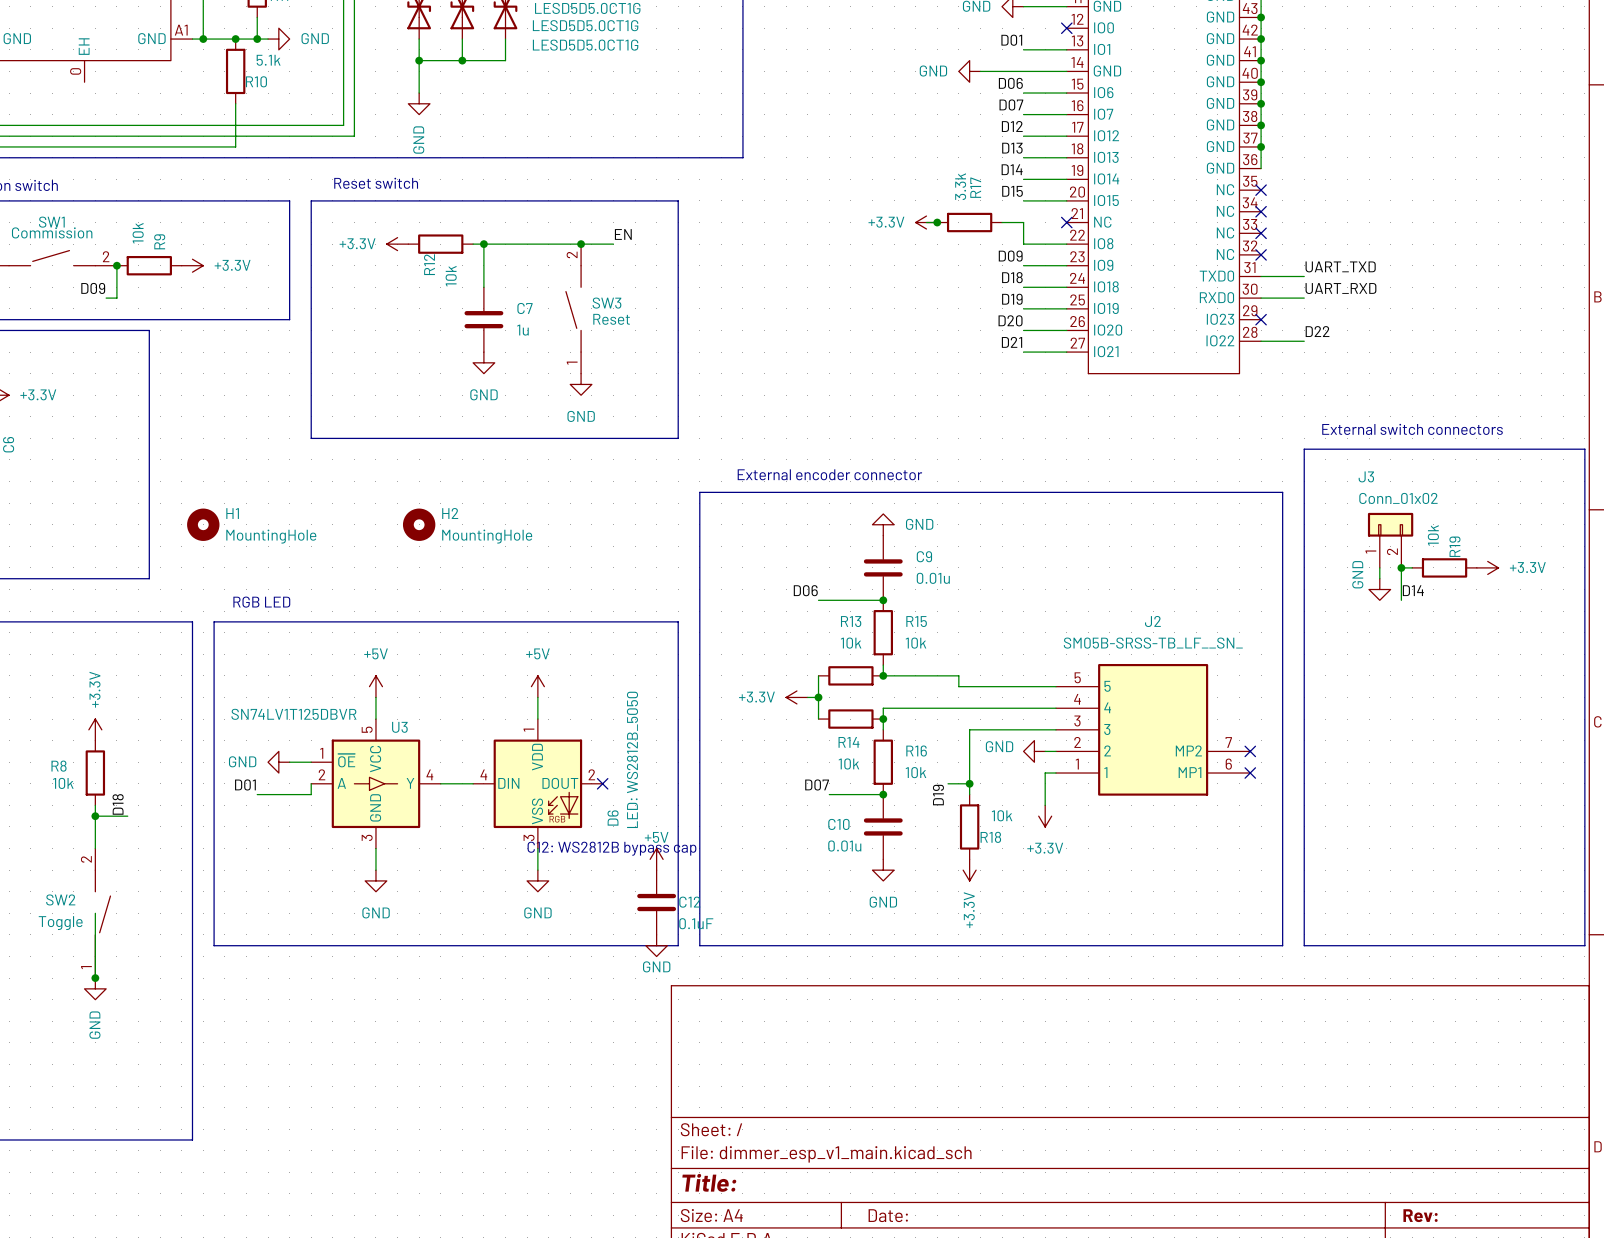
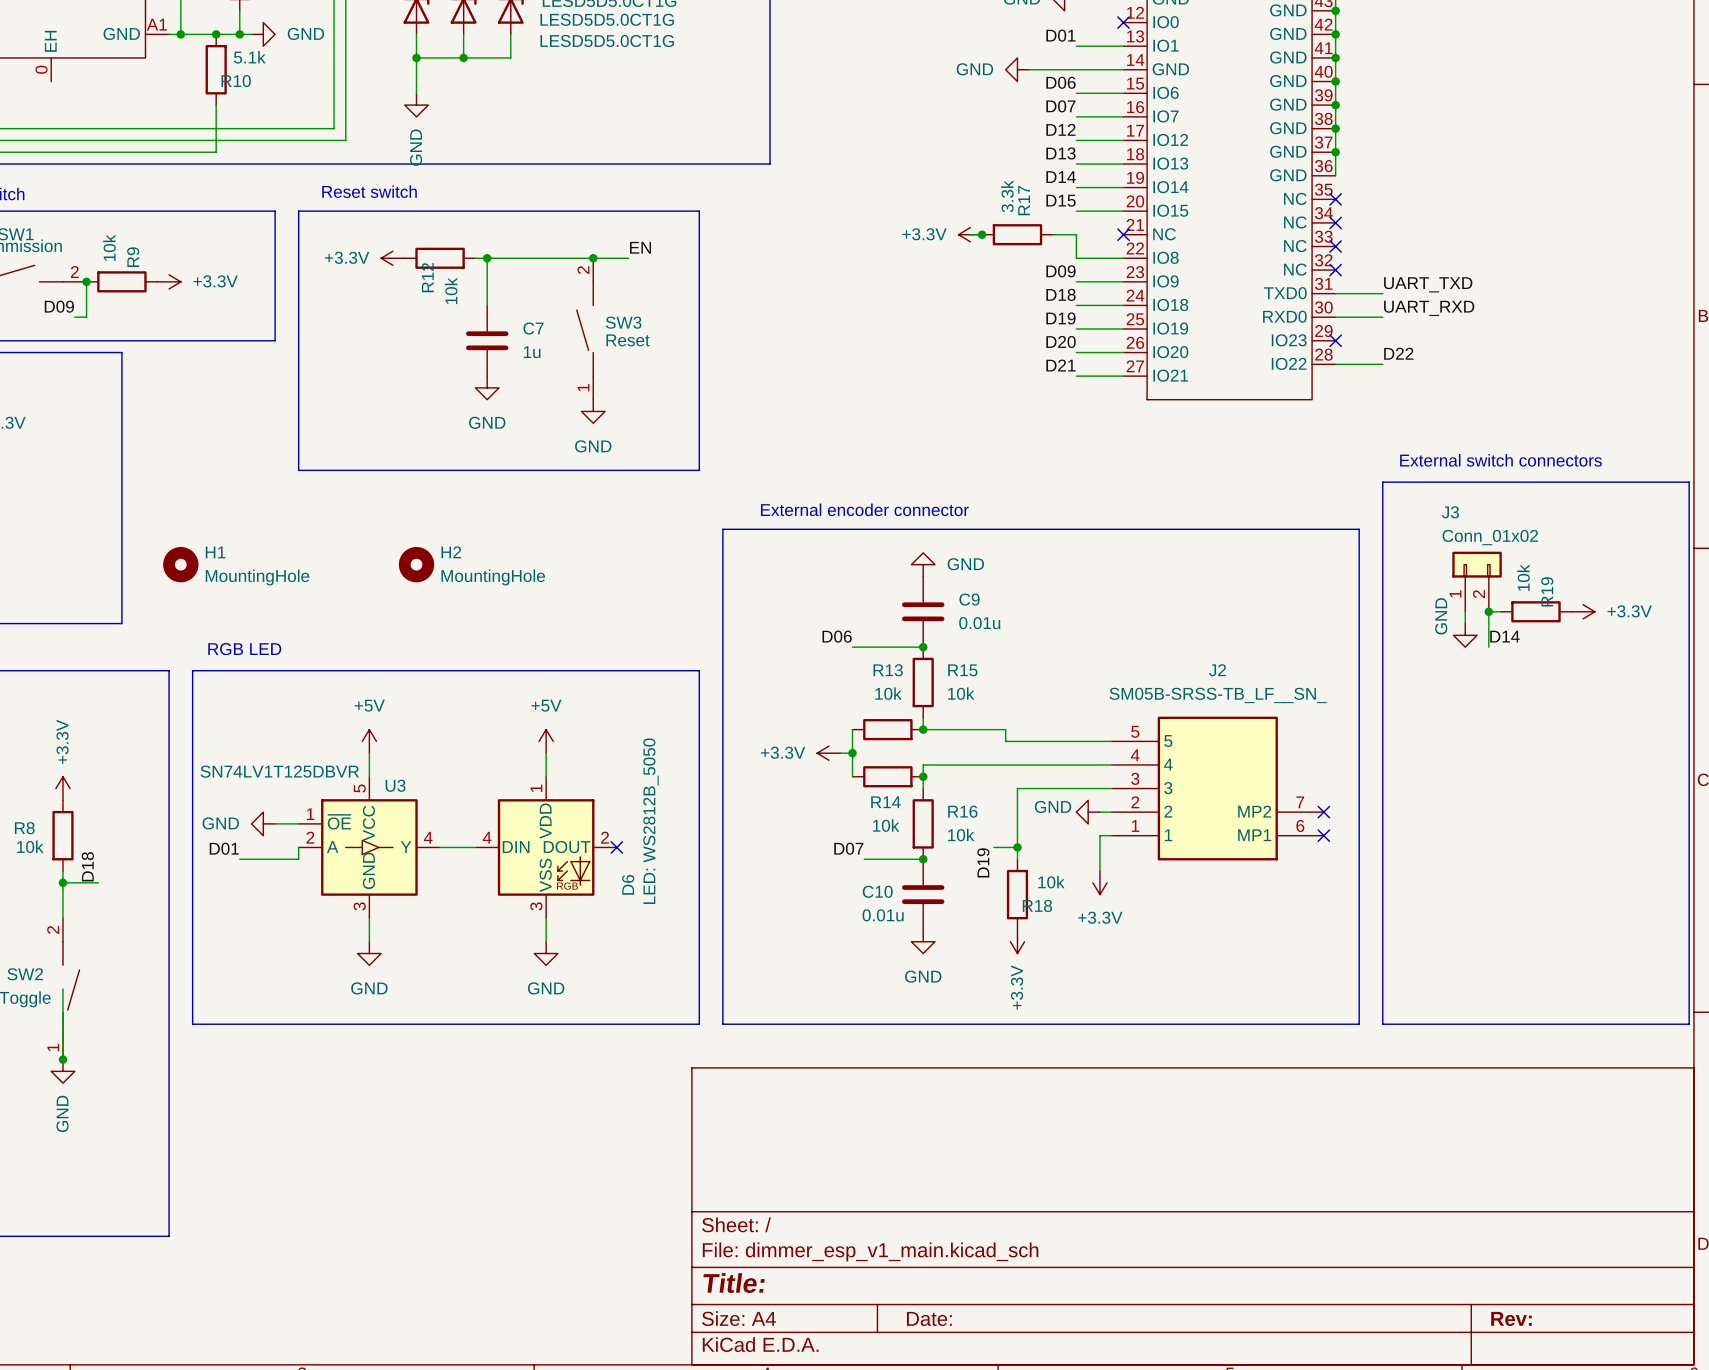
text: C12: WS2812B bypass cap (611, 848) -> none
power symbol: +5V (656, 859) -> none
C12: 0.1uF (656, 902) -> none
power symbol: GND (656, 945) -> none

